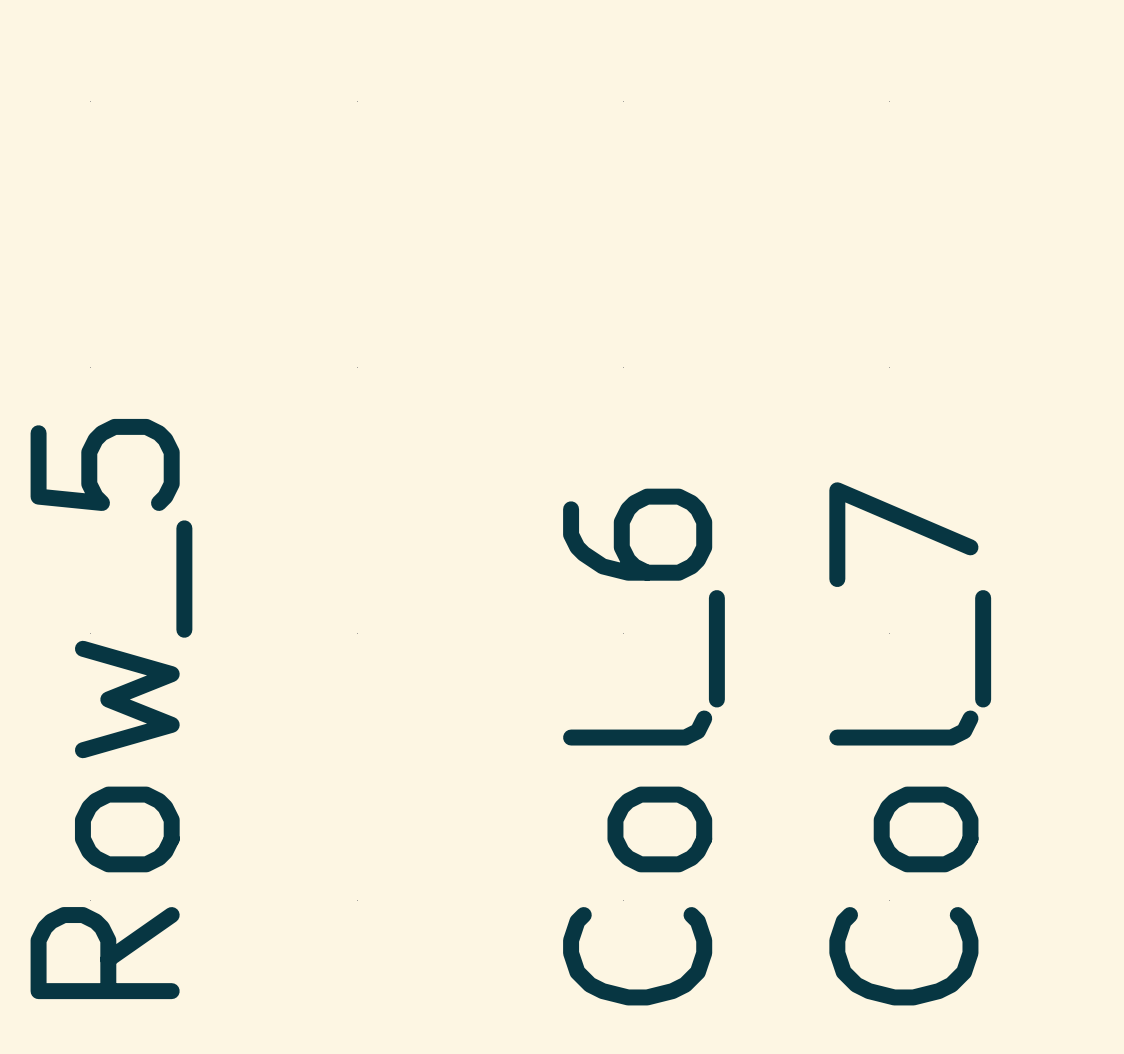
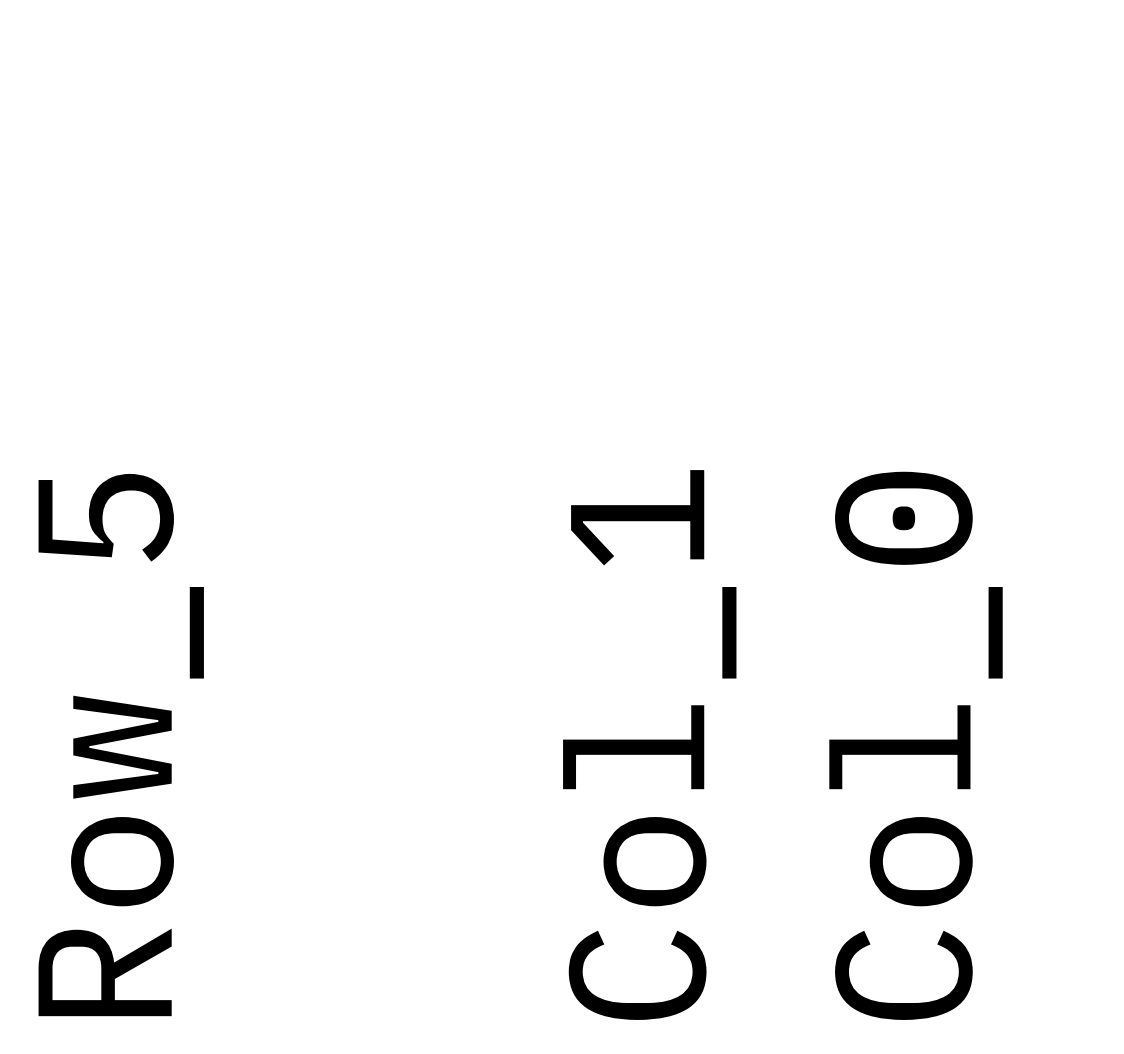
label: Col_7 (910, 743) -> Col_0 (916, 745)
label: Col_6 (643, 747) -> Col_1 (649, 745)

